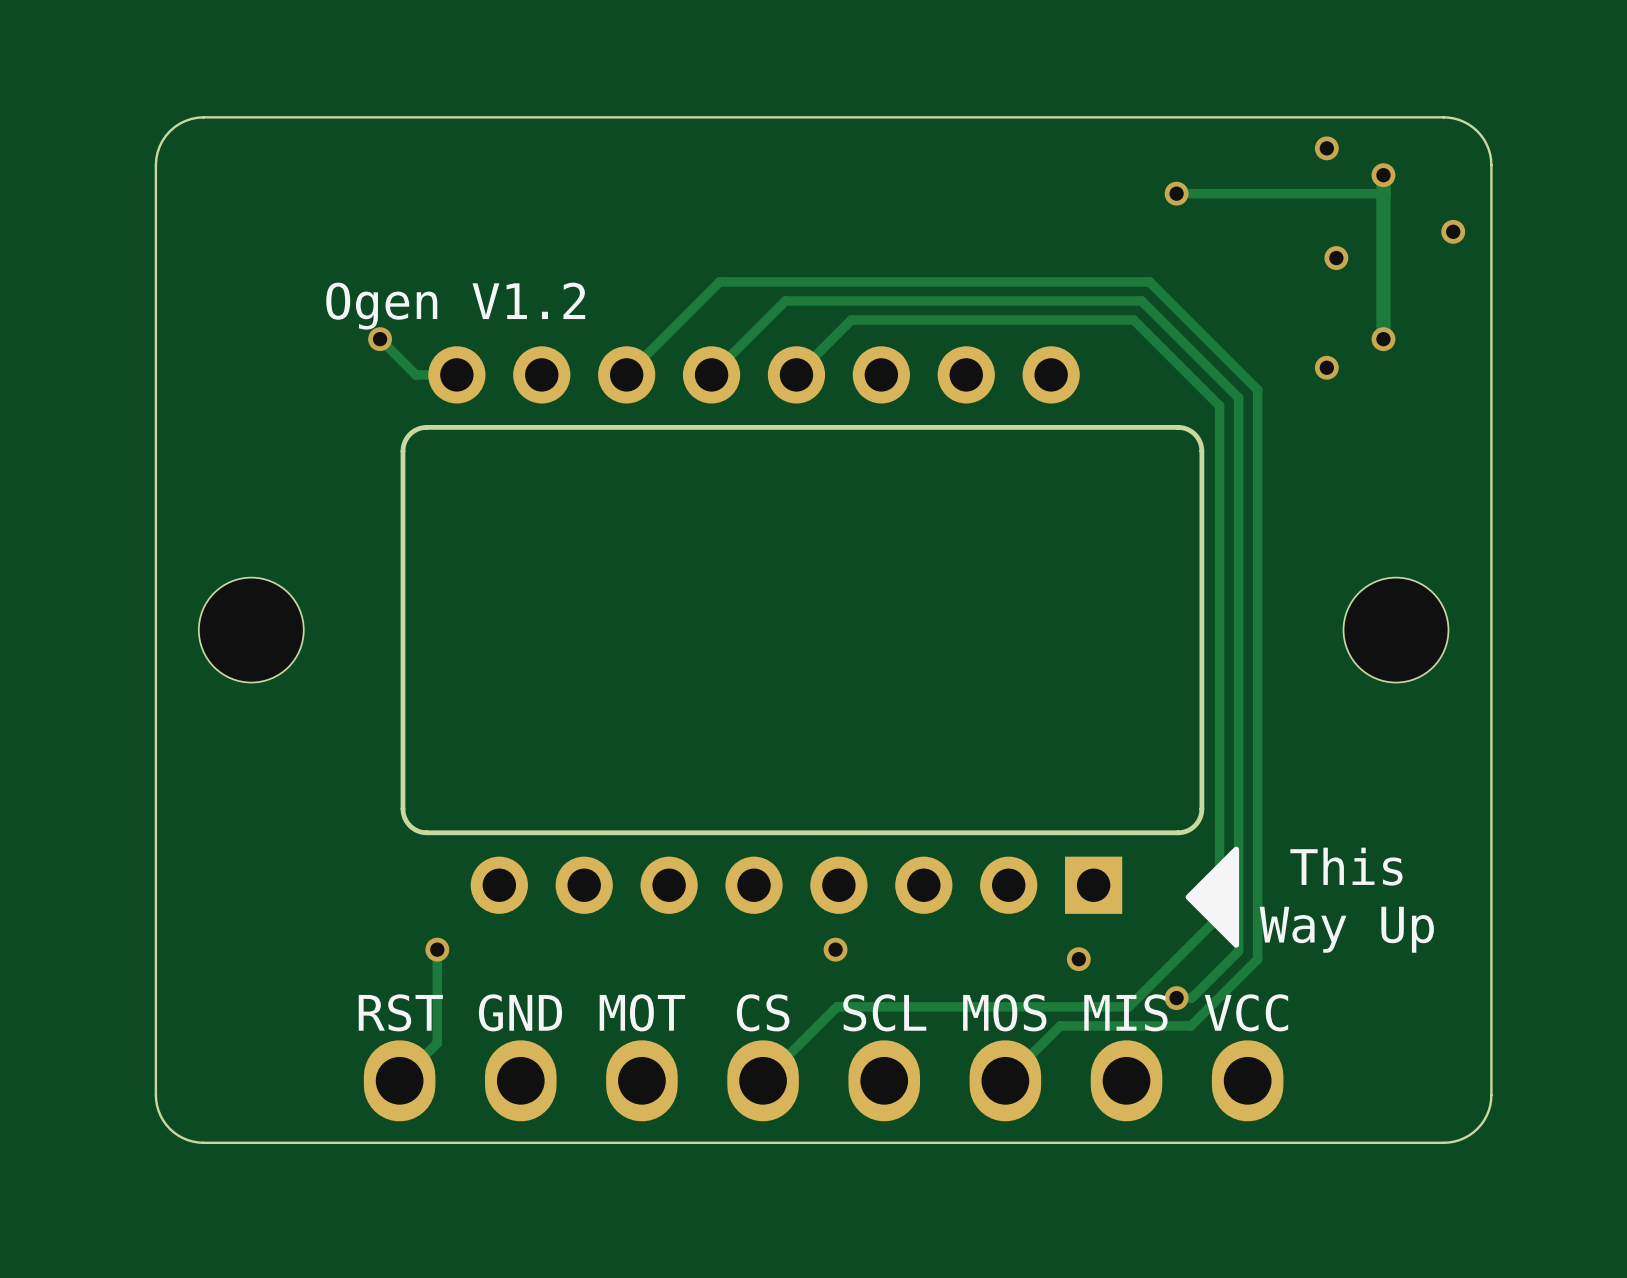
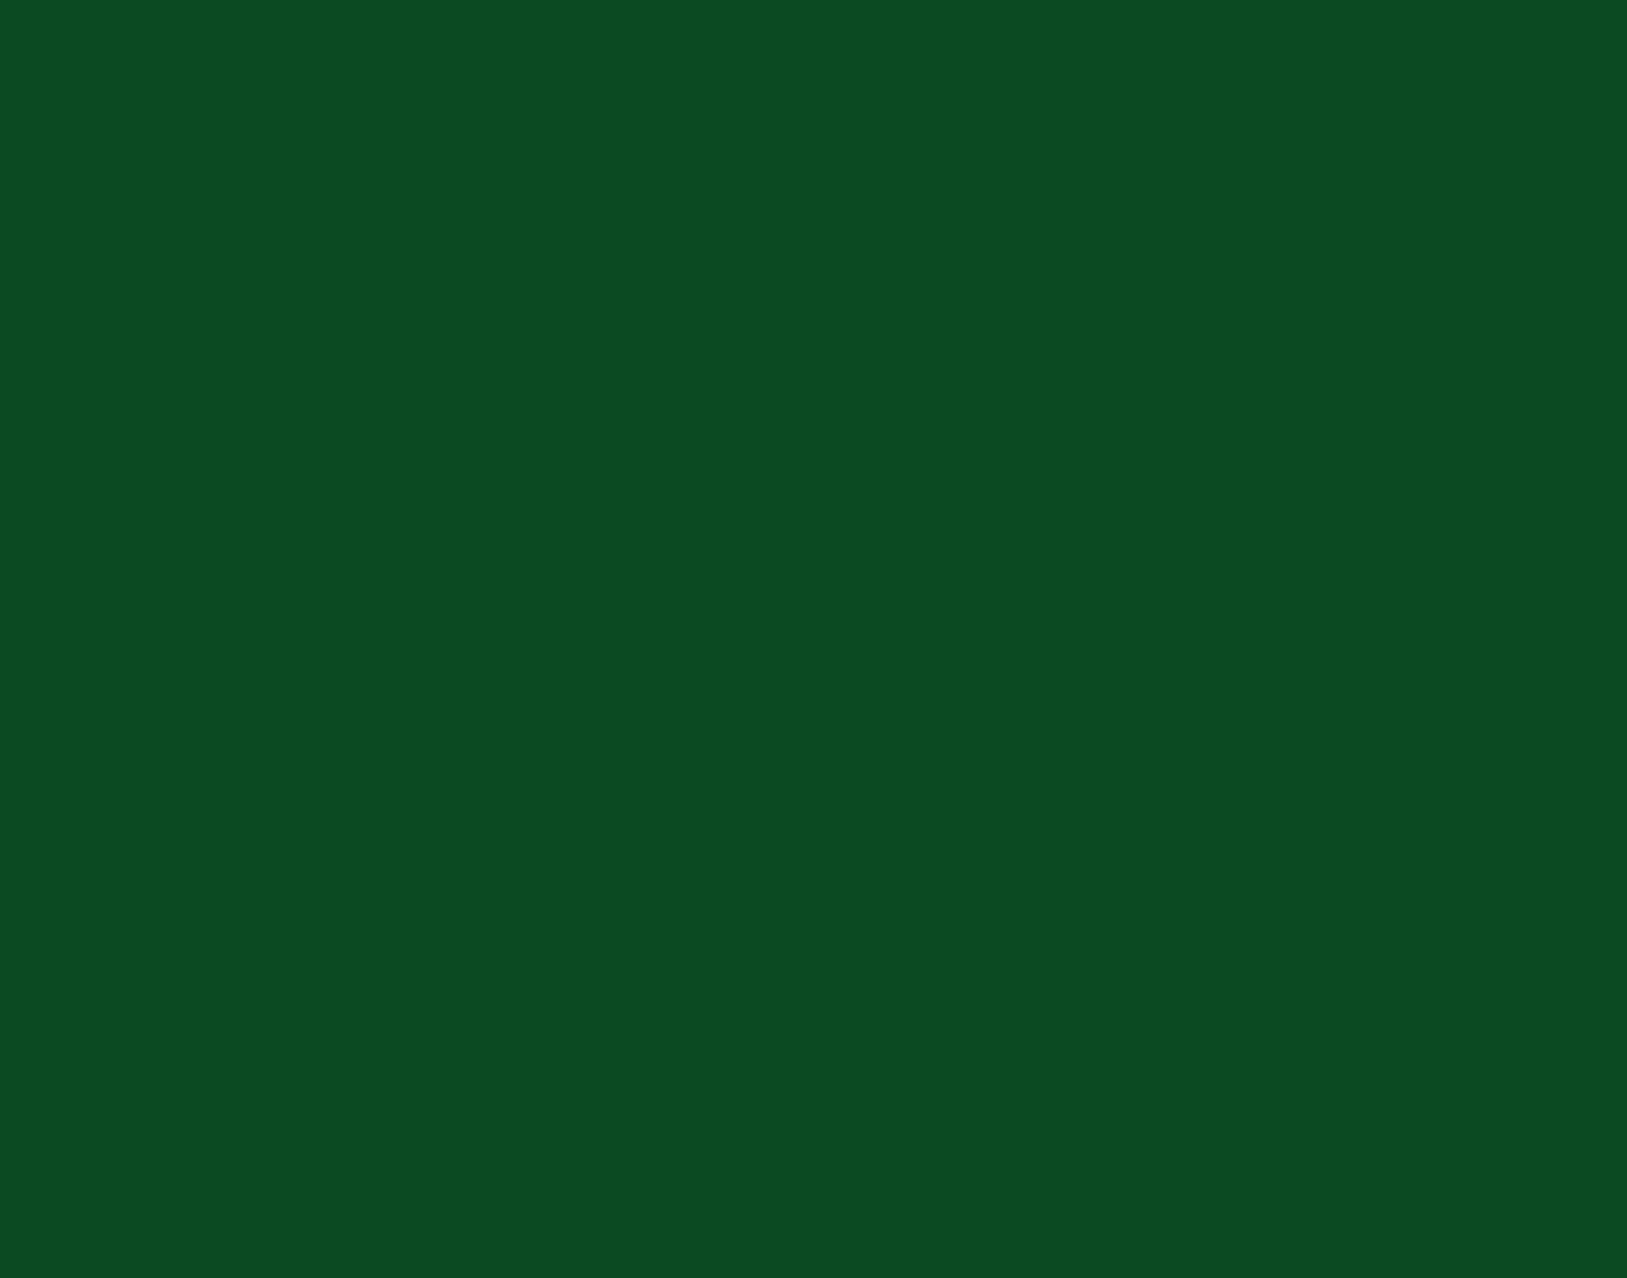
board edge: (203, 117) (1443, 117) (1459, 120) (1473, 127) (1486, 144) (1491, 165) (1491, 1095) (1488, 1110) (1480, 1124) (1464, 1138) (1443, 1142) (203, 1142) (187, 1140) (173, 1132) (160, 1115) (155, 1095) (155, 165) (159, 146) (169, 131) (185, 120) (203, 117) -> none
via: (1326, 148) -> none
track: (1383, 175) (1383, 339) -> none
via: (1383, 175) -> none
track: (1176, 193) (1383, 193) -> none
via: (1176, 193) -> none
via: (1453, 231) -> none
via: (1336, 258) -> none
text: Ogen V1.2 (455, 306) -> none
track: (380, 339) (415, 374) (456, 374) -> none
via: (380, 339) -> none
via: (1383, 339) -> none
via: (1326, 367) -> none
track: (626, 374) (719, 281) (1149, 281) (1257, 389) (1257, 959) (1190, 1025) (1060, 1025) (1005, 1080) -> none
track: (711, 374) (785, 300) (1141, 300) (1238, 397) (1238, 951) (1191, 998) (1176, 998) -> none
track: (796, 374) (851, 320) (1133, 320) (1219, 405) (1219, 916) (1128, 1006) (837, 1006) (763, 1080) -> none
part: (251, 630) -> none
part: (802, 630) -> none
part: (1395, 630) -> none
drawing: [1185, 846, 1240, 948] -> none
text: This (1346, 866) -> none
text: Way Up (1346, 929) -> none
track: (437, 949) (437, 1043) (399, 1080) (399, 1069) -> none
via: (437, 949) -> none
via: (835, 949) -> none
via: (1078, 959) -> none
via: (1176, 998) -> none
text: RST (400, 1012) -> none
text: GND (520, 1012) -> none
text: MOT (642, 1012) -> none
text: CS (763, 1012) -> none
text: SCL (884, 1012) -> none
text: MOS (1004, 1012) -> none
text: MIS (1125, 1012) -> none
text: VCC (1246, 1012) -> none
part: (823, 1080) -> none

